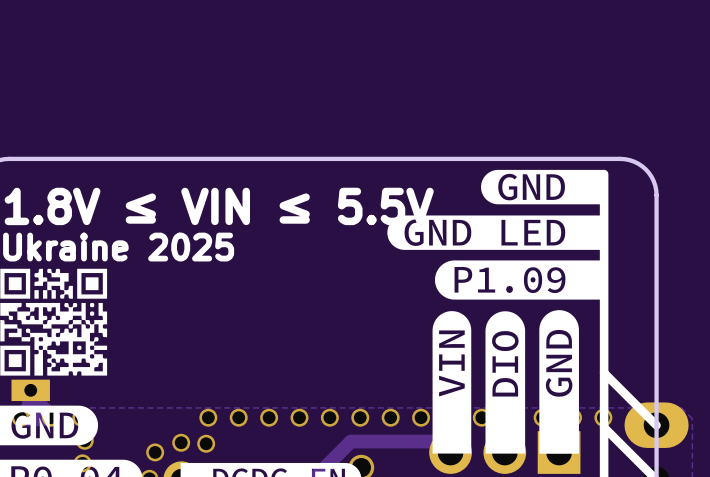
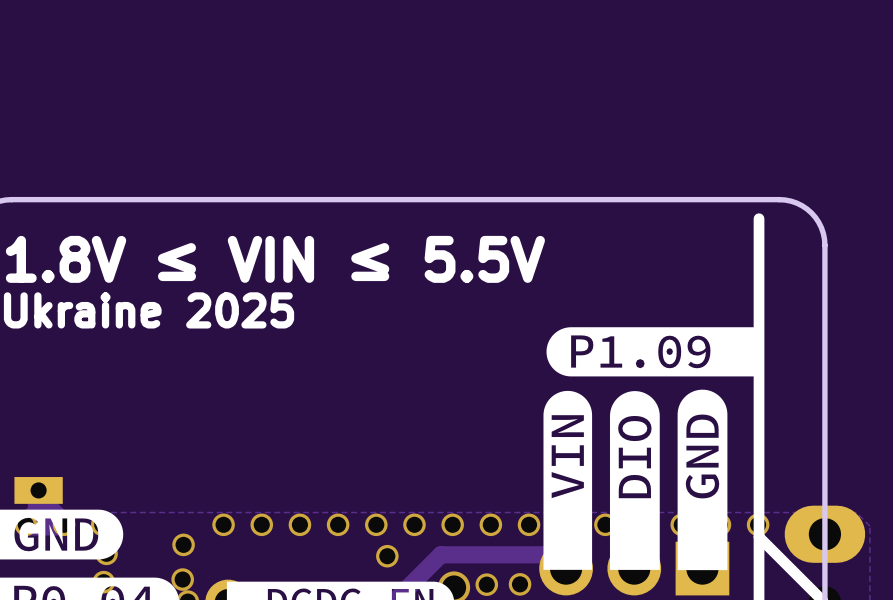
drawing: [387, 169, 605, 250] -> none
drawing: [0, 268, 108, 376] -> none
line: (604, 372) (656, 425) -> none
via: none -> (223, 524)
via: none -> (183, 544)
via: (181, 442) -> none
via: none -> (387, 556)
via: (206, 443) -> none
via position: (155, 452) -> (182, 579)
via: none -> (486, 584)
via: none -> (520, 584)

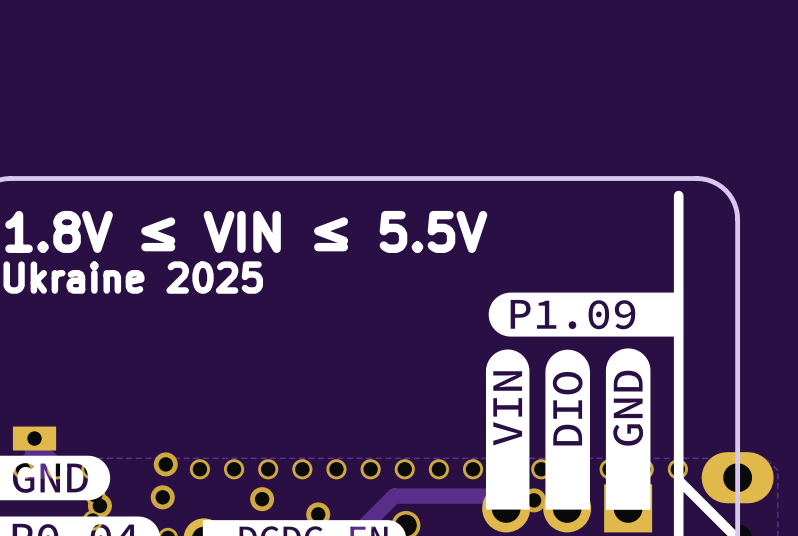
via: none -> (165, 464)
via: (183, 544) -> none
via: none -> (162, 497)
via: (387, 556) -> none
via: none -> (262, 499)
via: none -> (534, 500)
via: none -> (99, 505)
via: none -> (318, 514)
via: (182, 579) -> none
via: (486, 584) -> none
via: (520, 584) -> none

